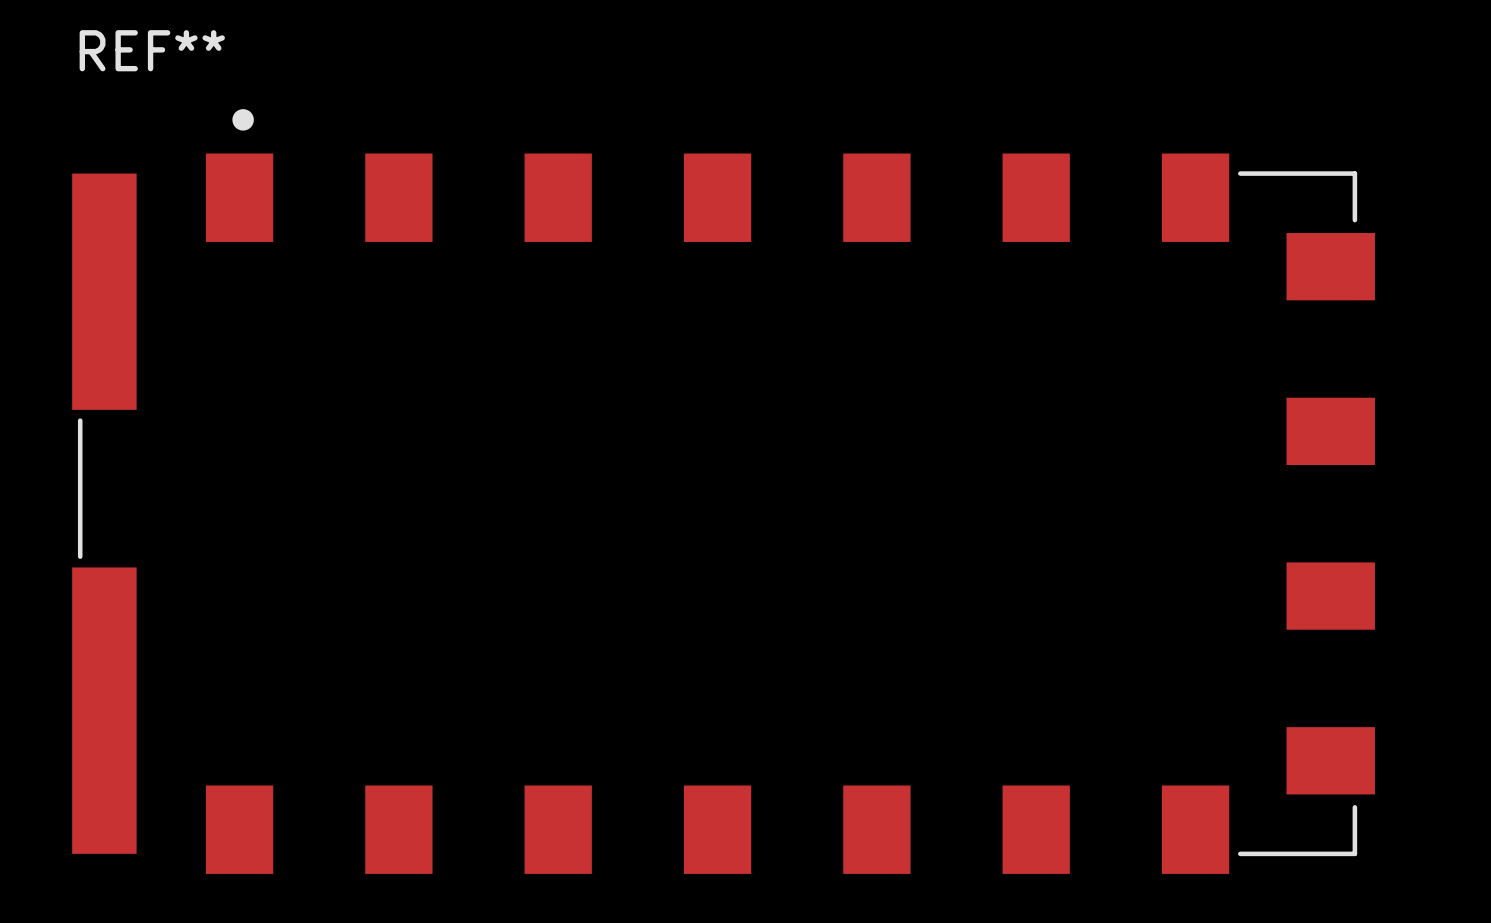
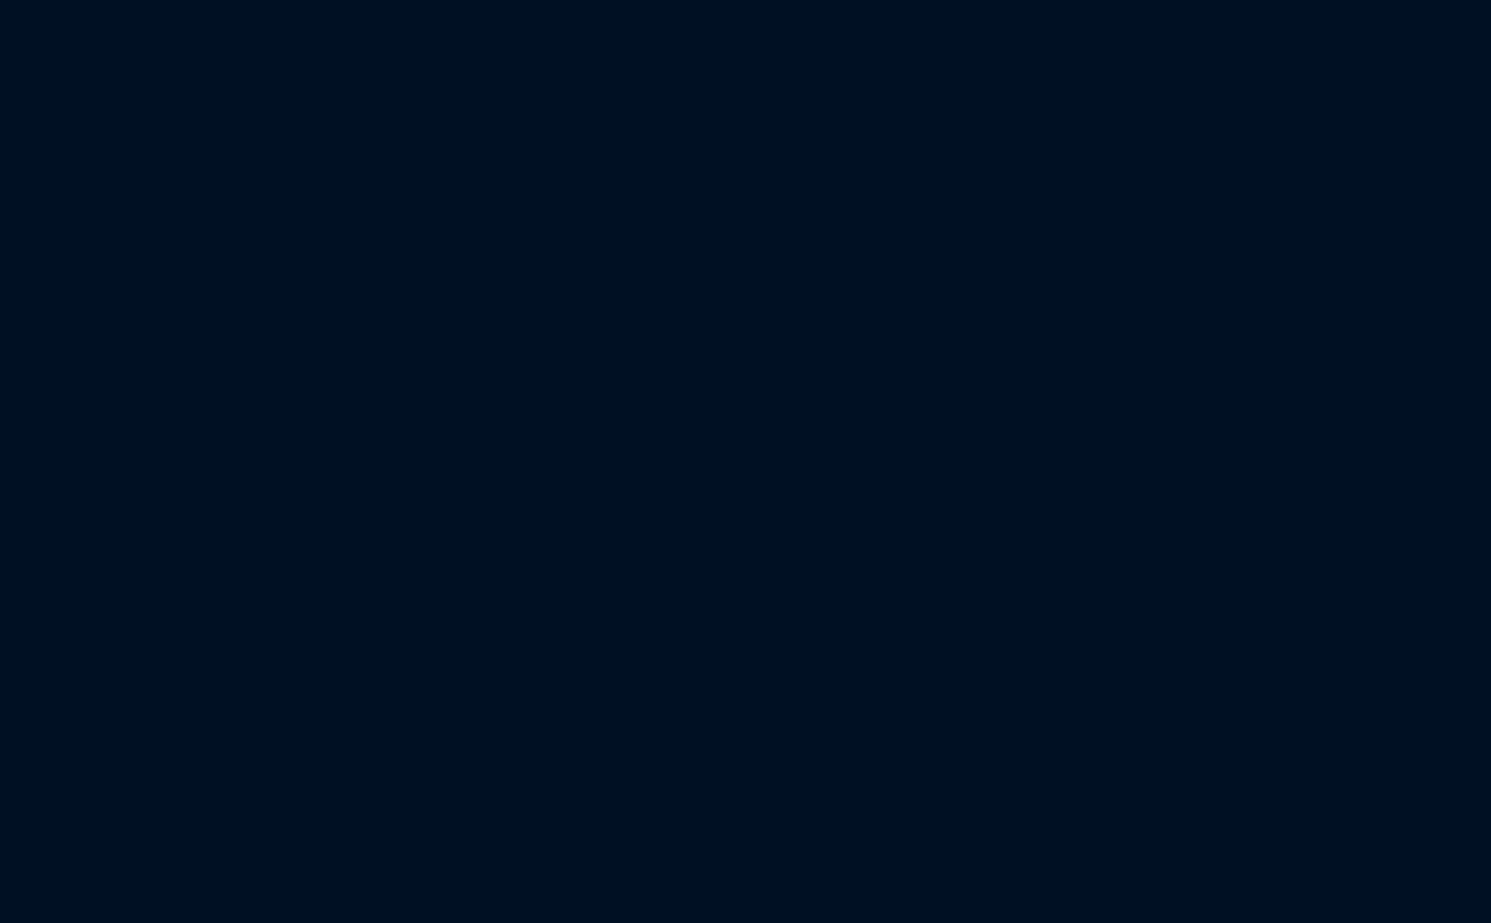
REF**: (723, 491) -> none

